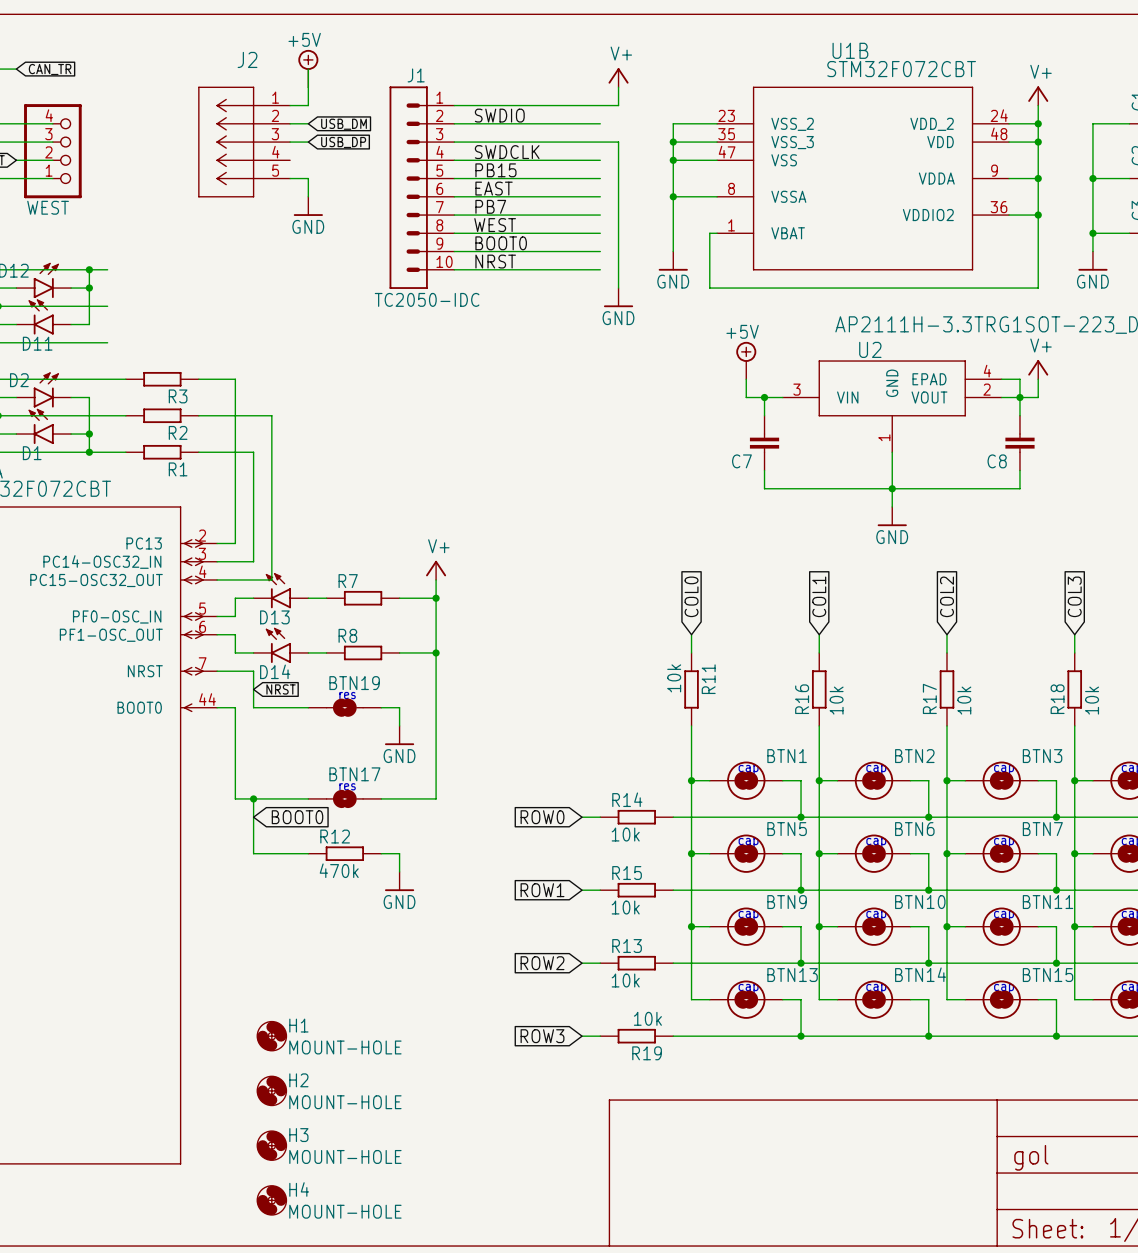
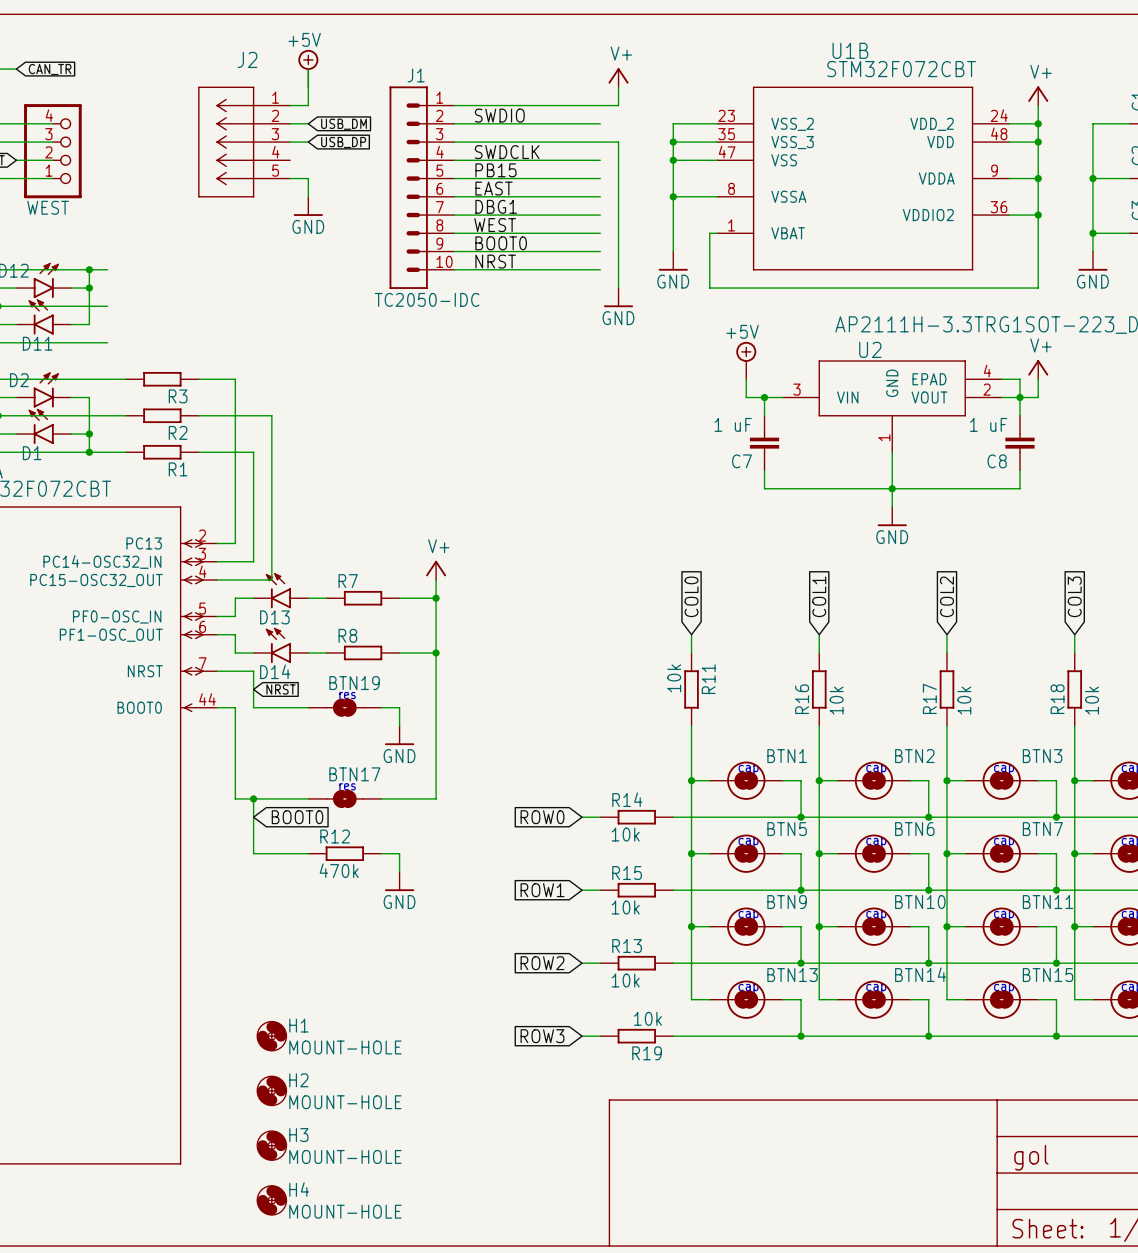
label: PB7 (490, 206) -> DBG1 (496, 206)
C7 value: none -> 1 uF (733, 424)
C8 value: none -> 1 uF (988, 424)

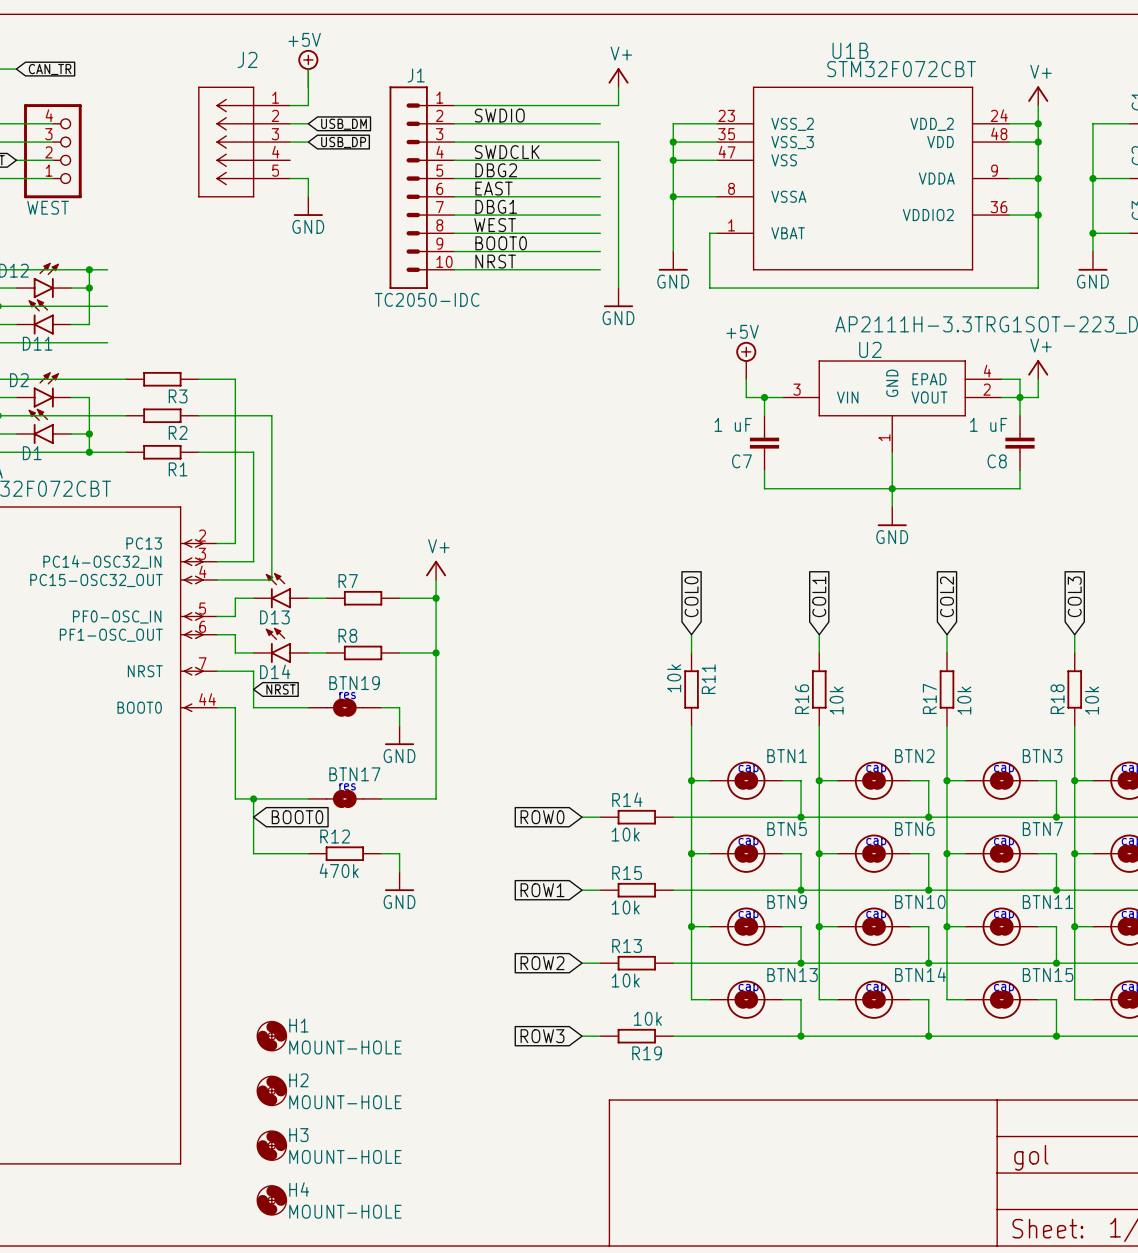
label: PB15 (495, 170) -> DBG2 (496, 170)

